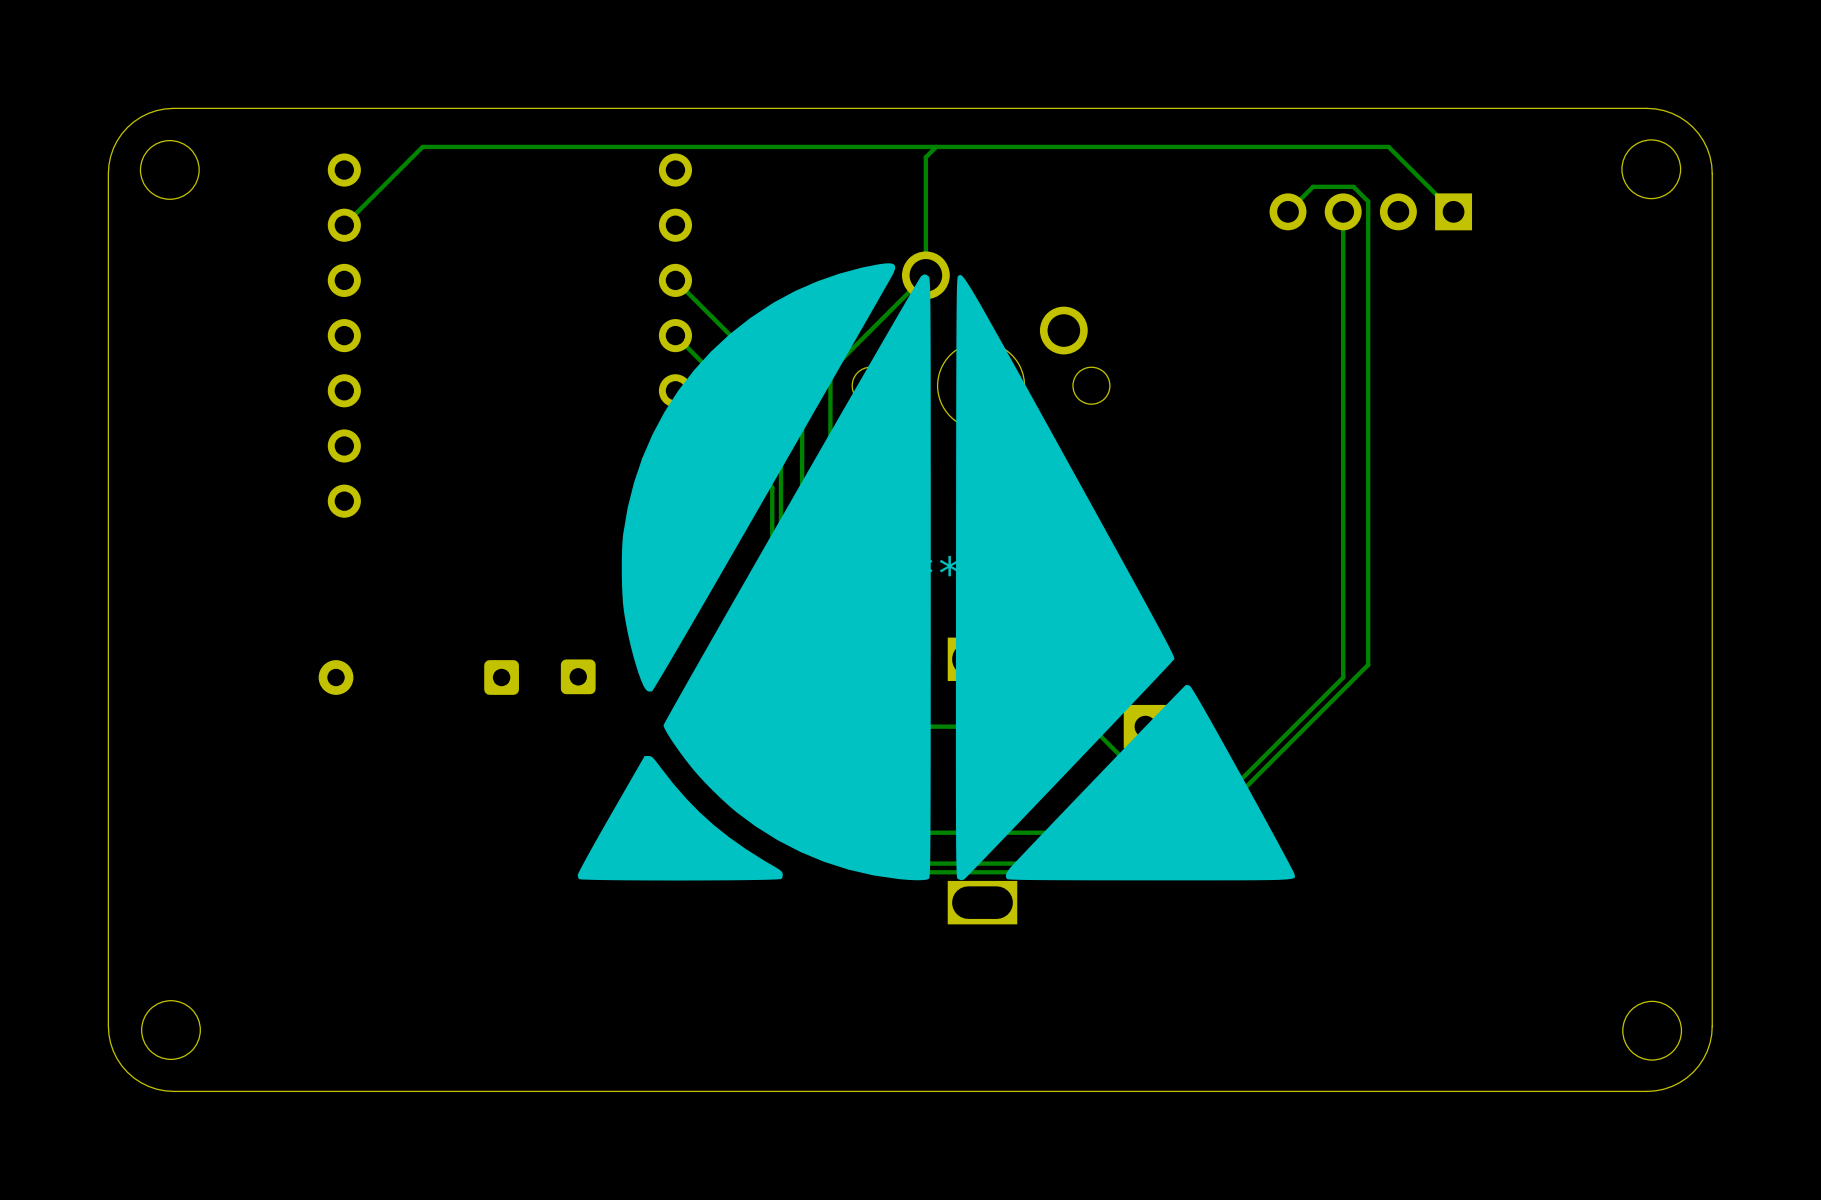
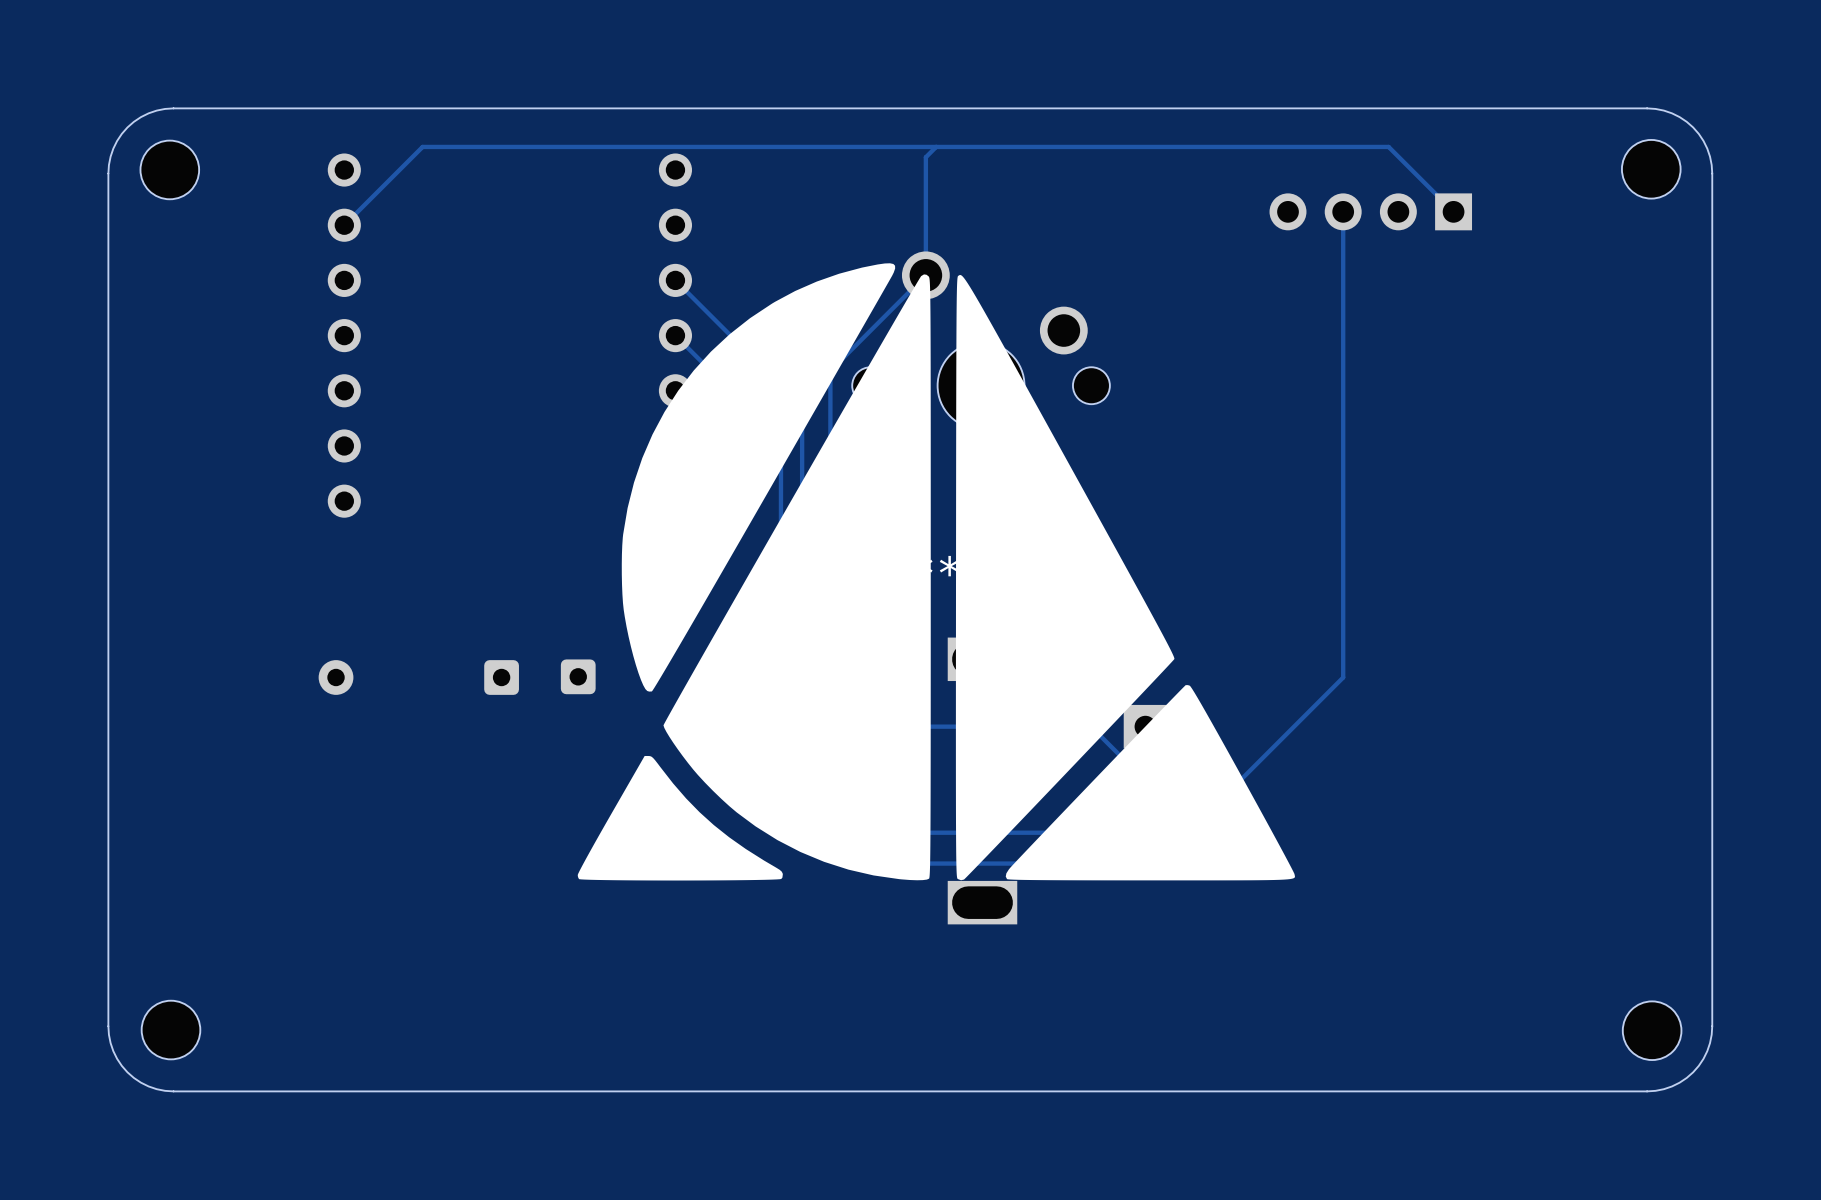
track: (1288, 211) (1313, 186) (1353, 186) (1368, 201) (1368, 664) (1160, 872) (911, 872) (772, 733) (772, 487) (675, 390) -> none

